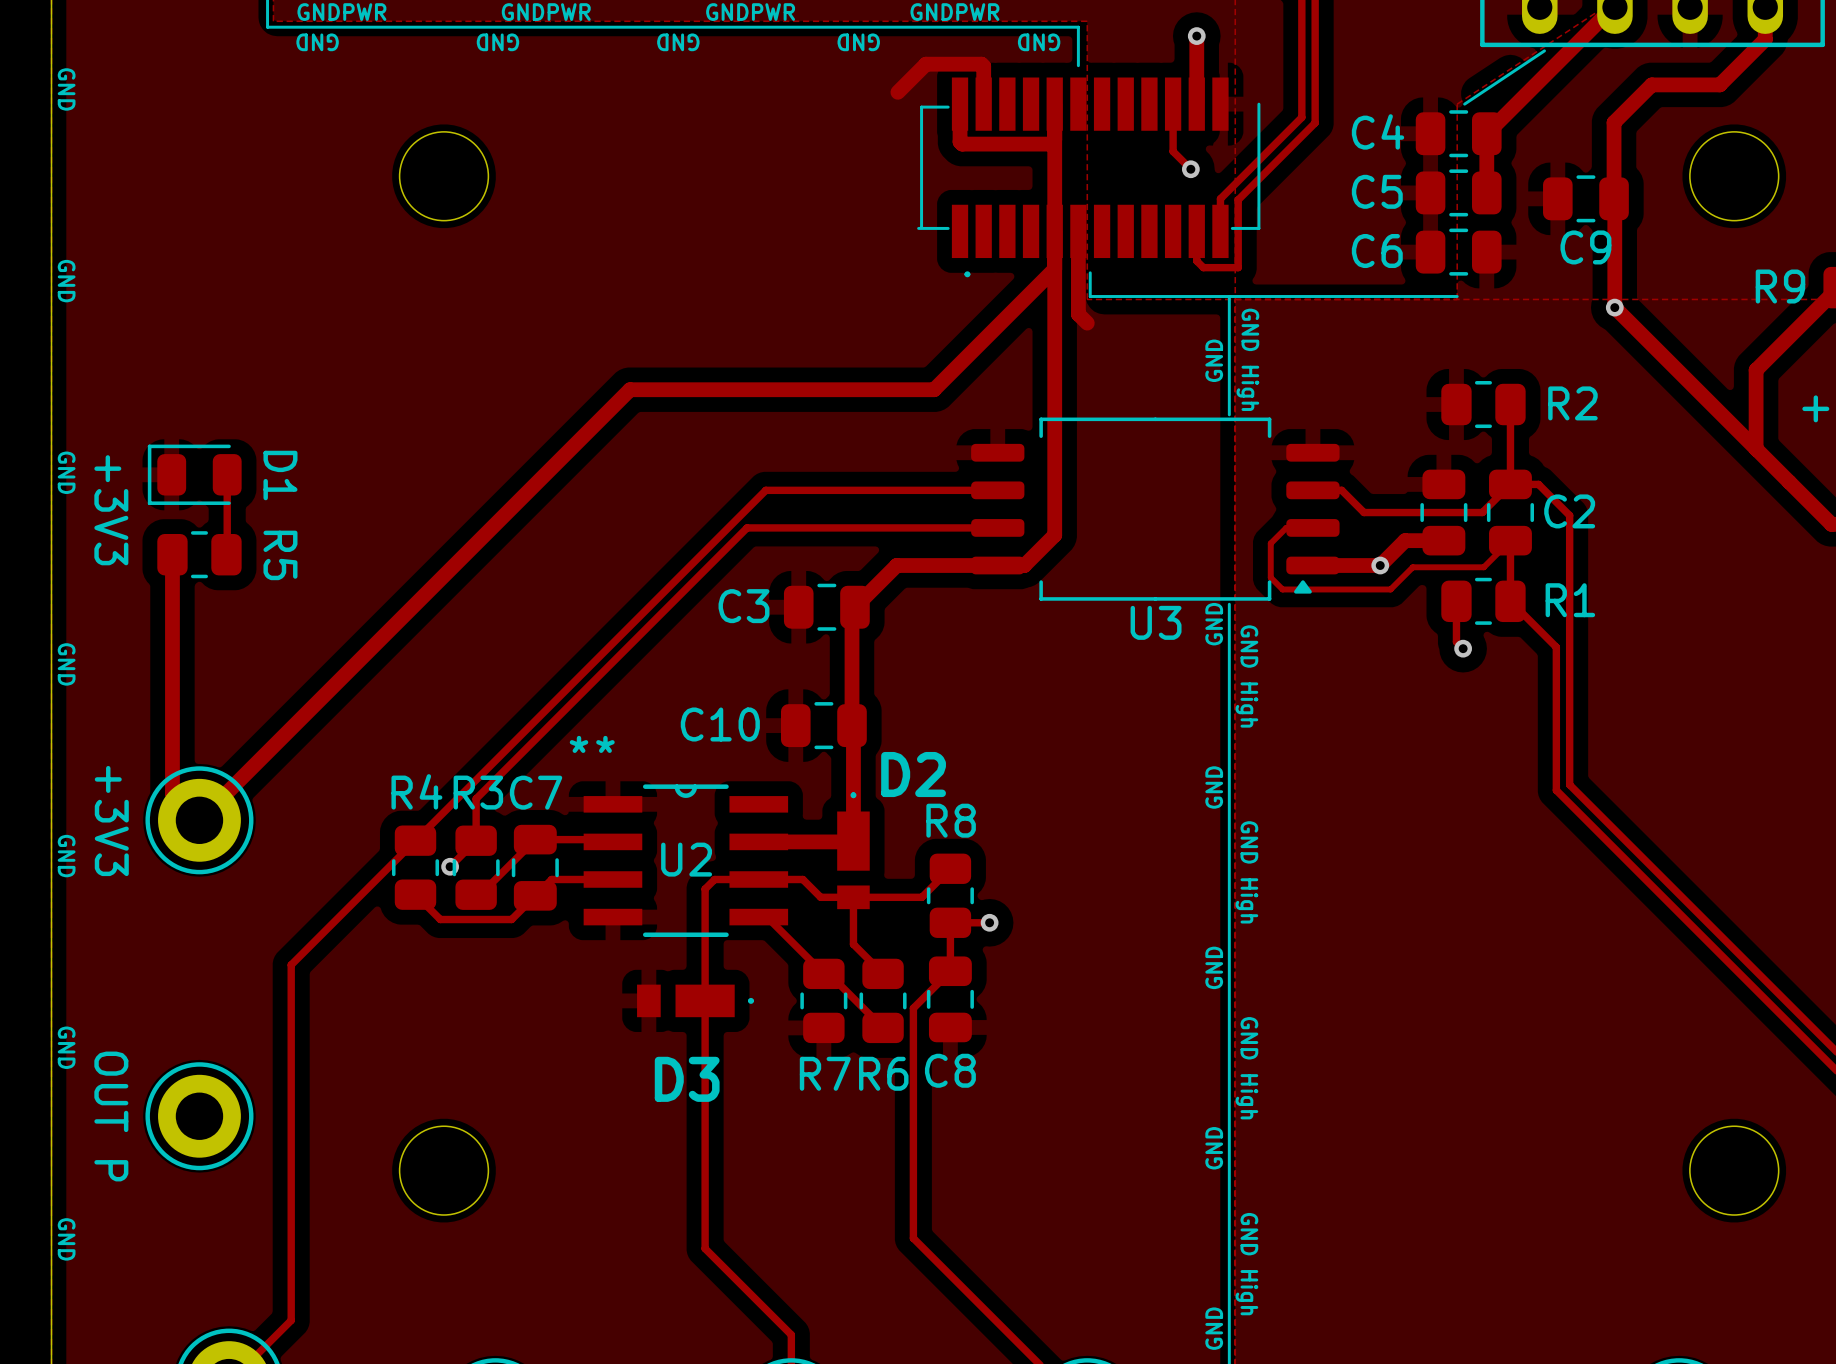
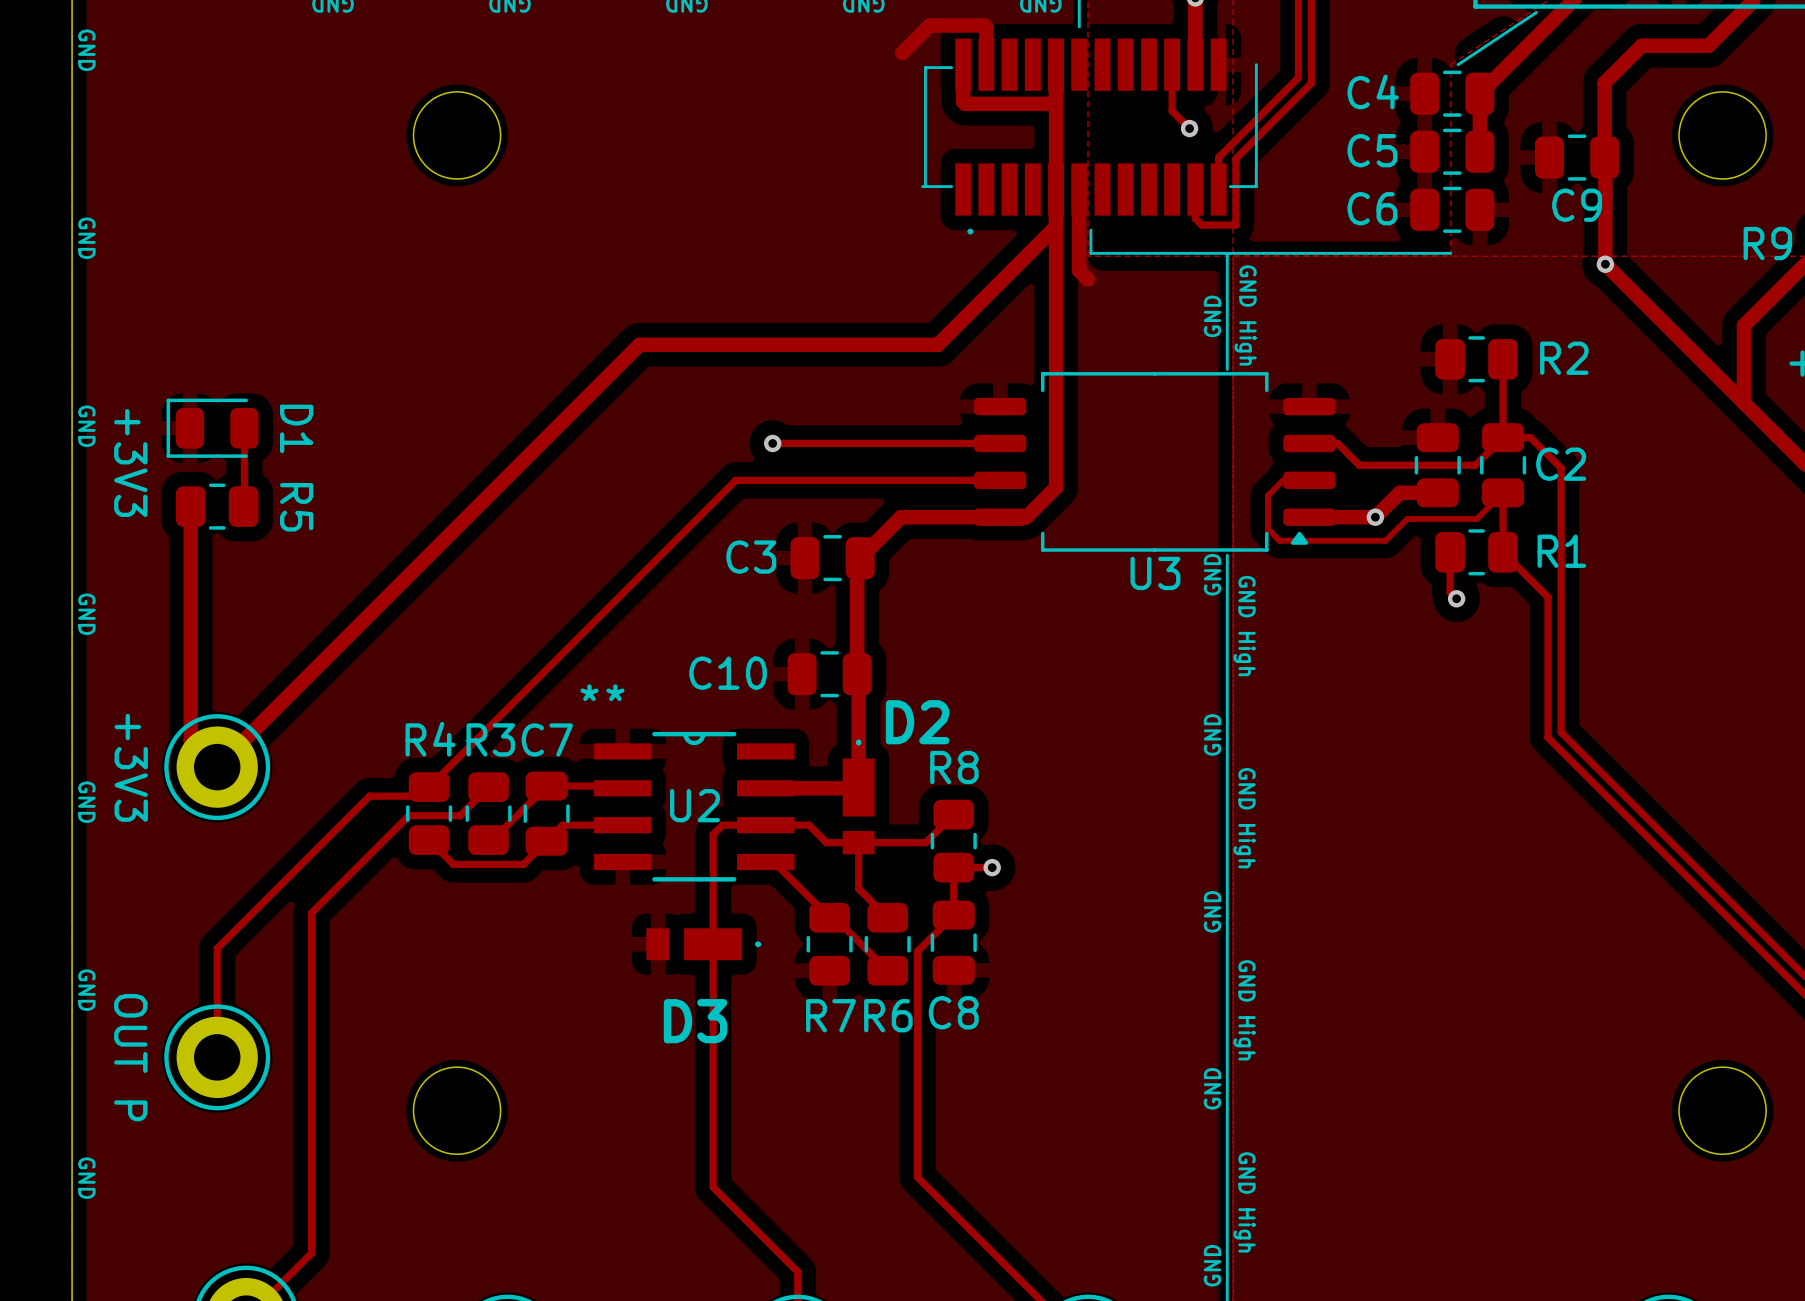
track: (765, 490) (728, 527) -> (754, 480) (735, 480)
via: none -> (772, 443)
track: (747, 527) (476, 798) (476, 840) -> none
track: (406, 849) (291, 964) (291, 1320) -> (463, 812) (459, 815) (408, 815) (311, 913) (311, 1253) (307, 1257)
track: none -> (420, 796) (369, 796) (217, 948) (217, 1057)
via: (450, 866) -> none

